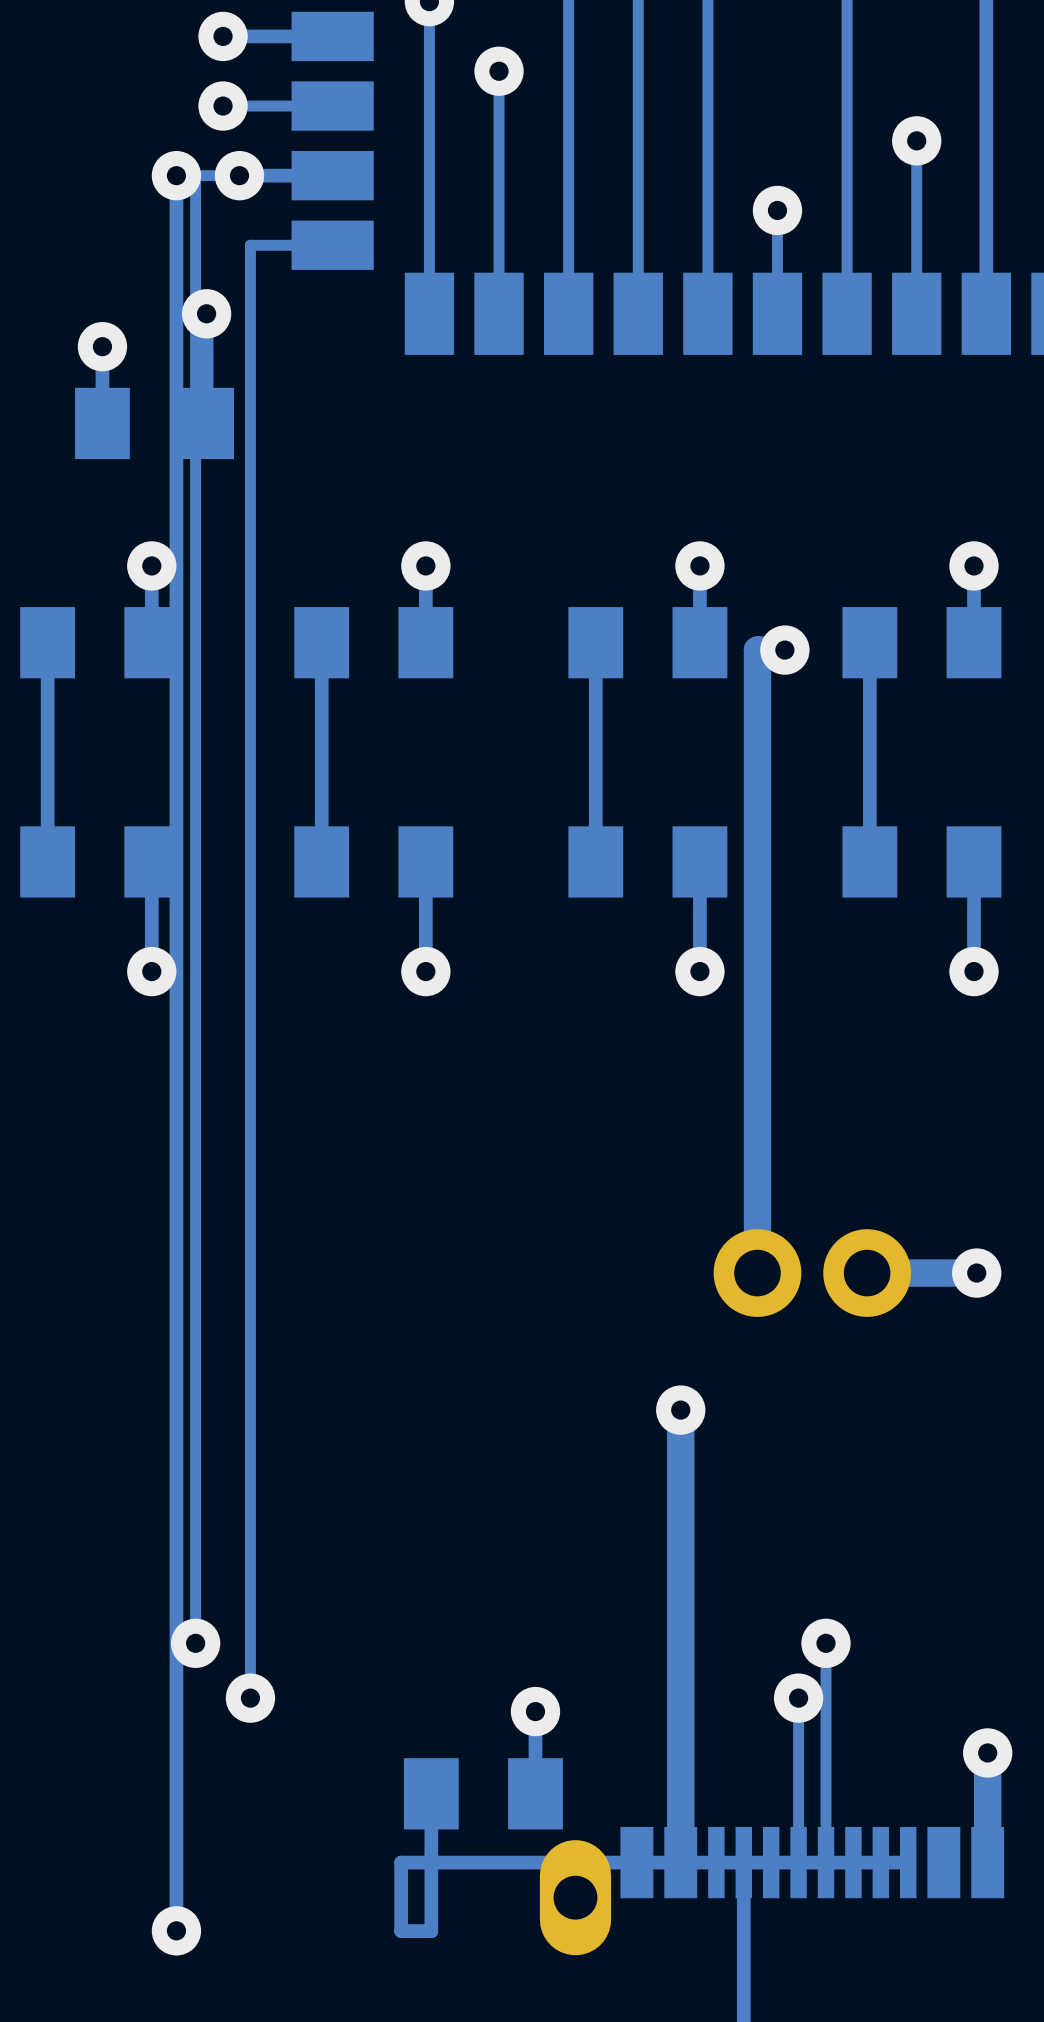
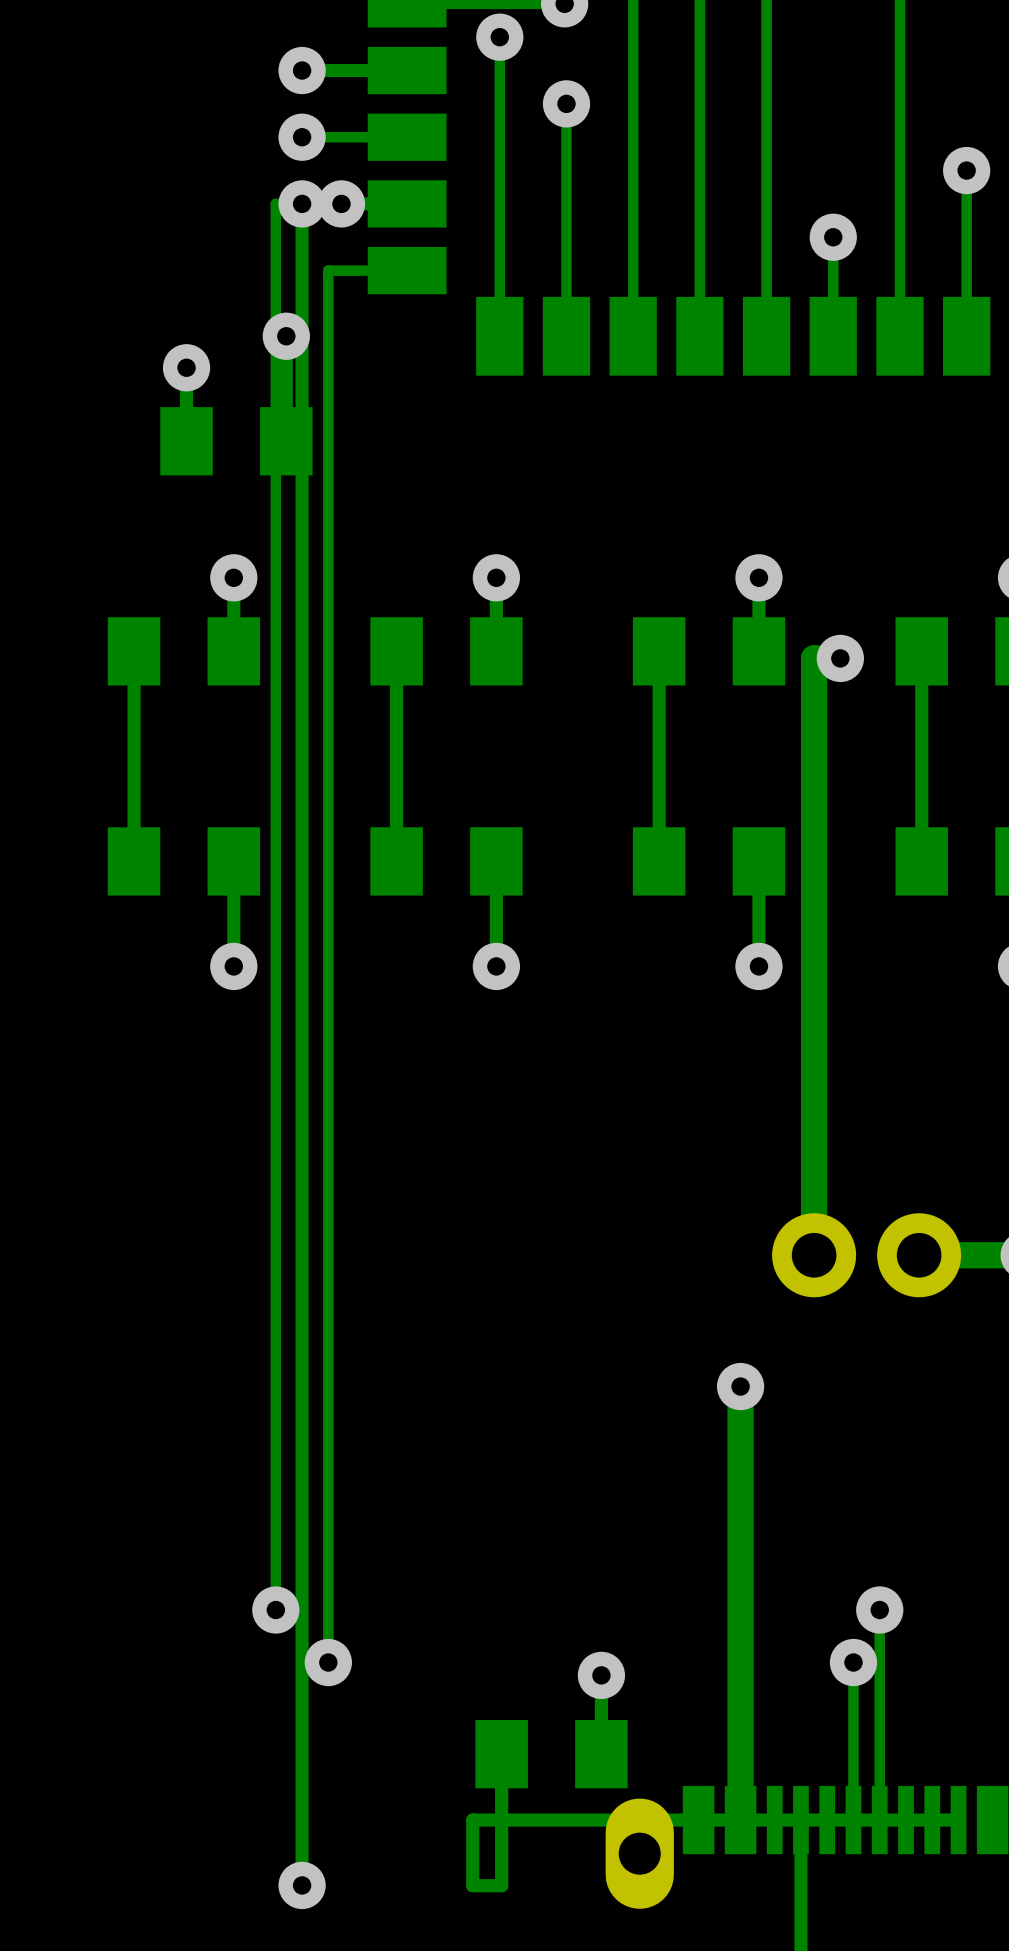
track: (176, 175) (176, 1930) -> (302, 203) (302, 1885)
via: (176, 175) -> none
via: none -> (302, 203)
via: (239, 175) -> none
via: none -> (341, 203)
via position: (176, 1930) -> (302, 1885)

